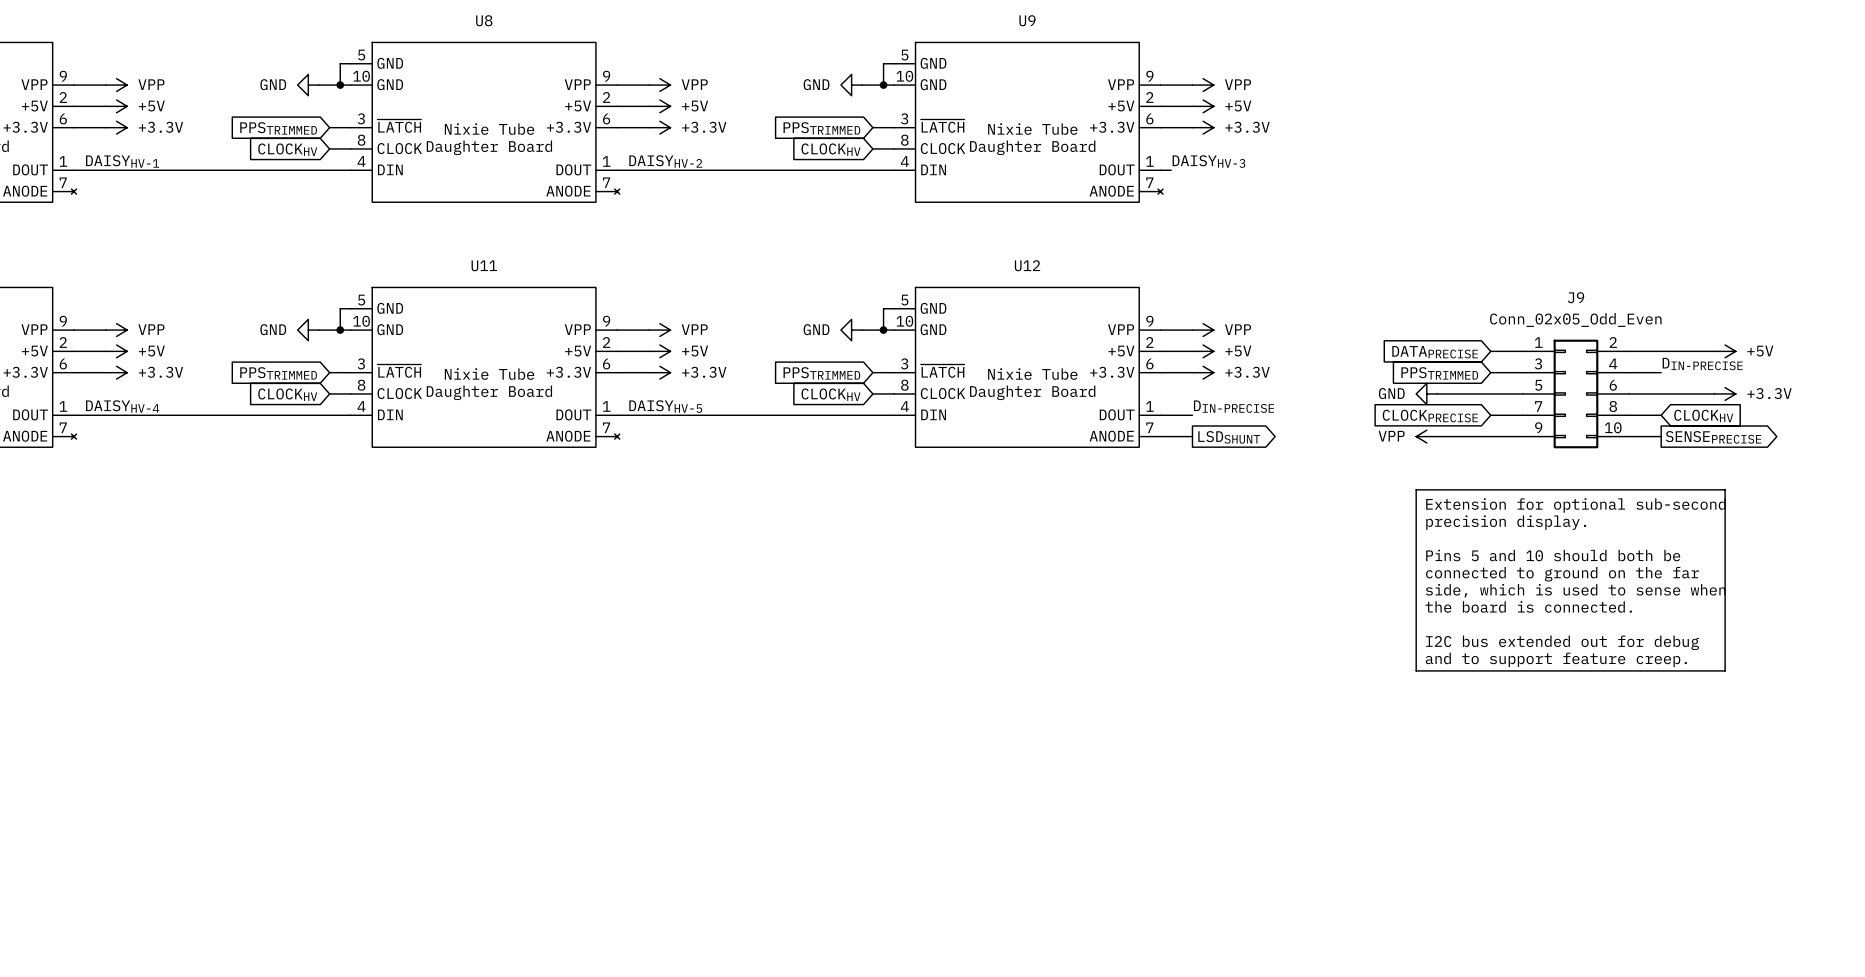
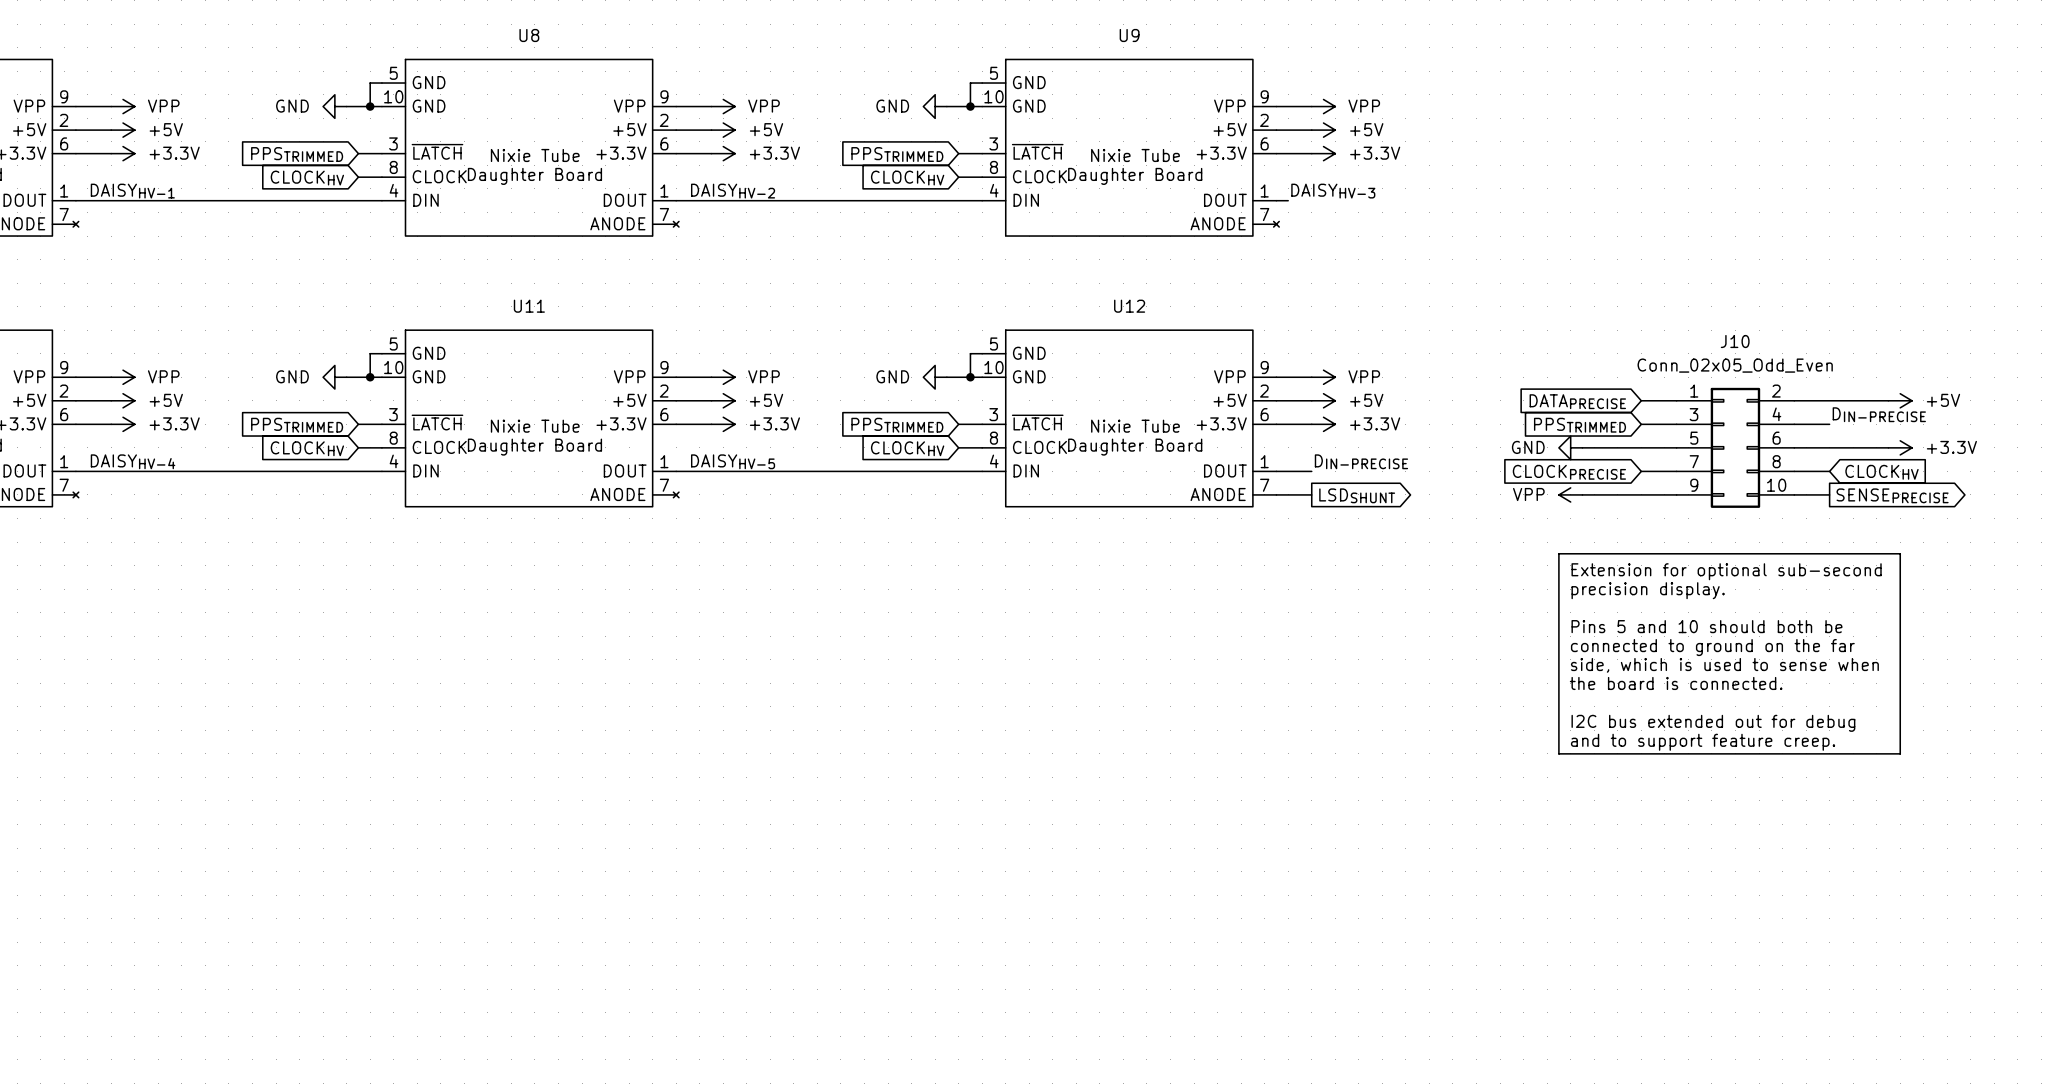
J9 name: J9 (1576, 297) -> J10 (1735, 341)

